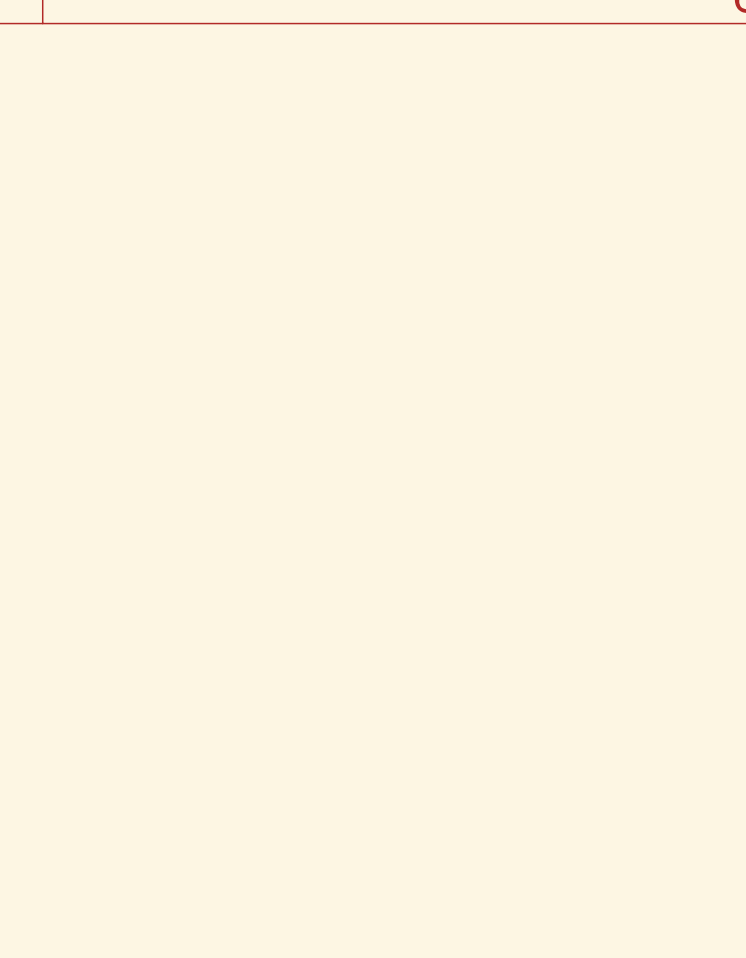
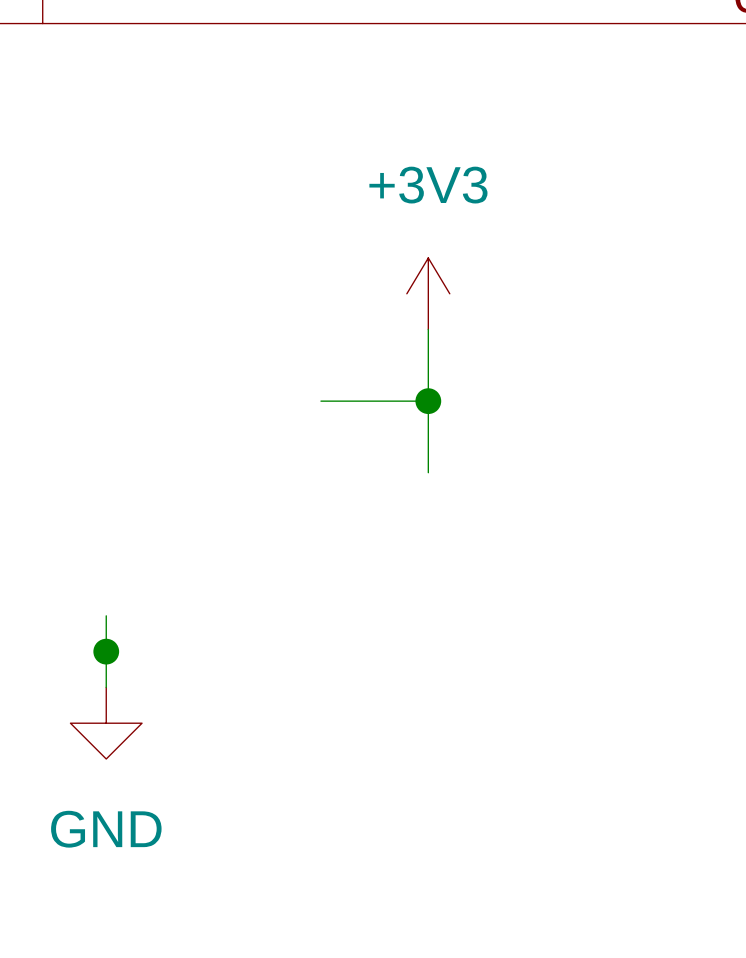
power symbol: none -> +3V3 (428, 293)
wire: none -> (428, 329) (428, 472)
wire: none -> (320, 401) (428, 401)
junction: none -> (428, 401)
wire: none -> (106, 615) (106, 687)
junction: none -> (106, 651)
power symbol: none -> GND (106, 723)

